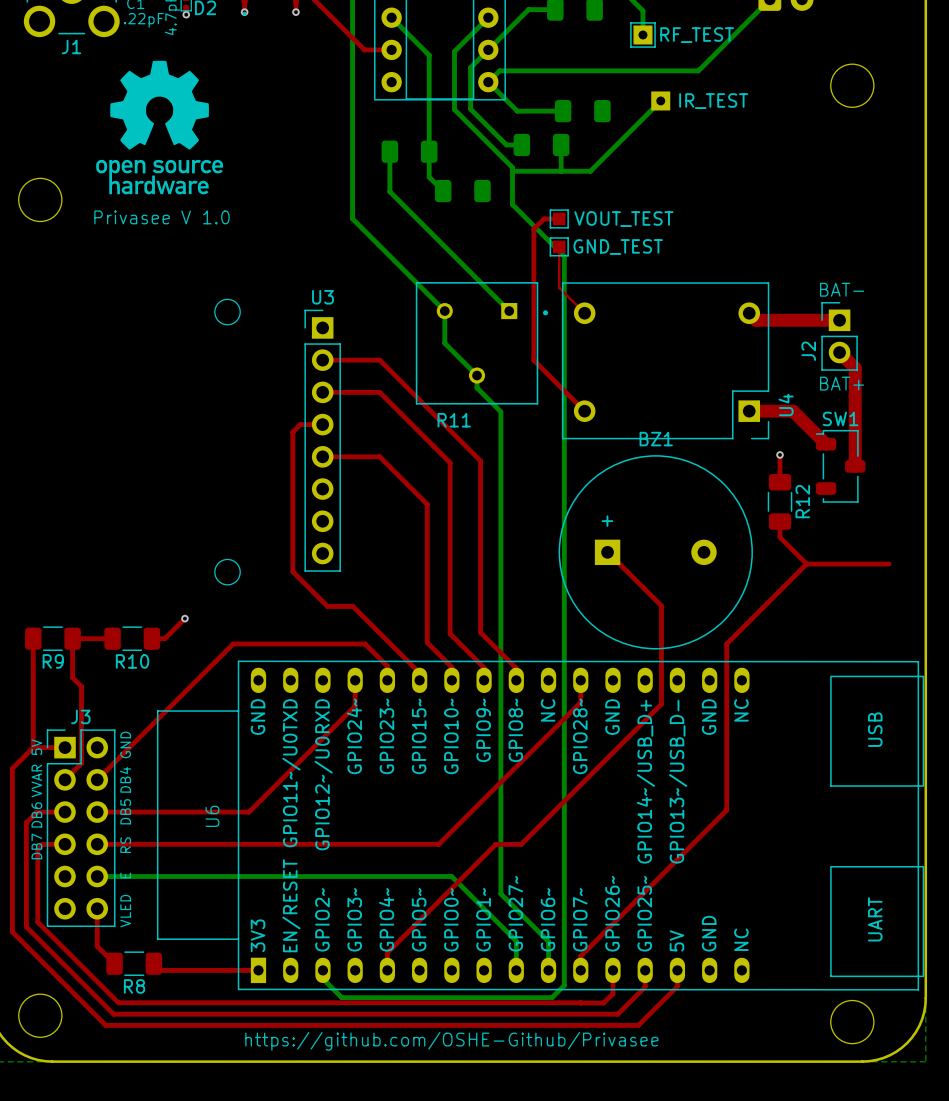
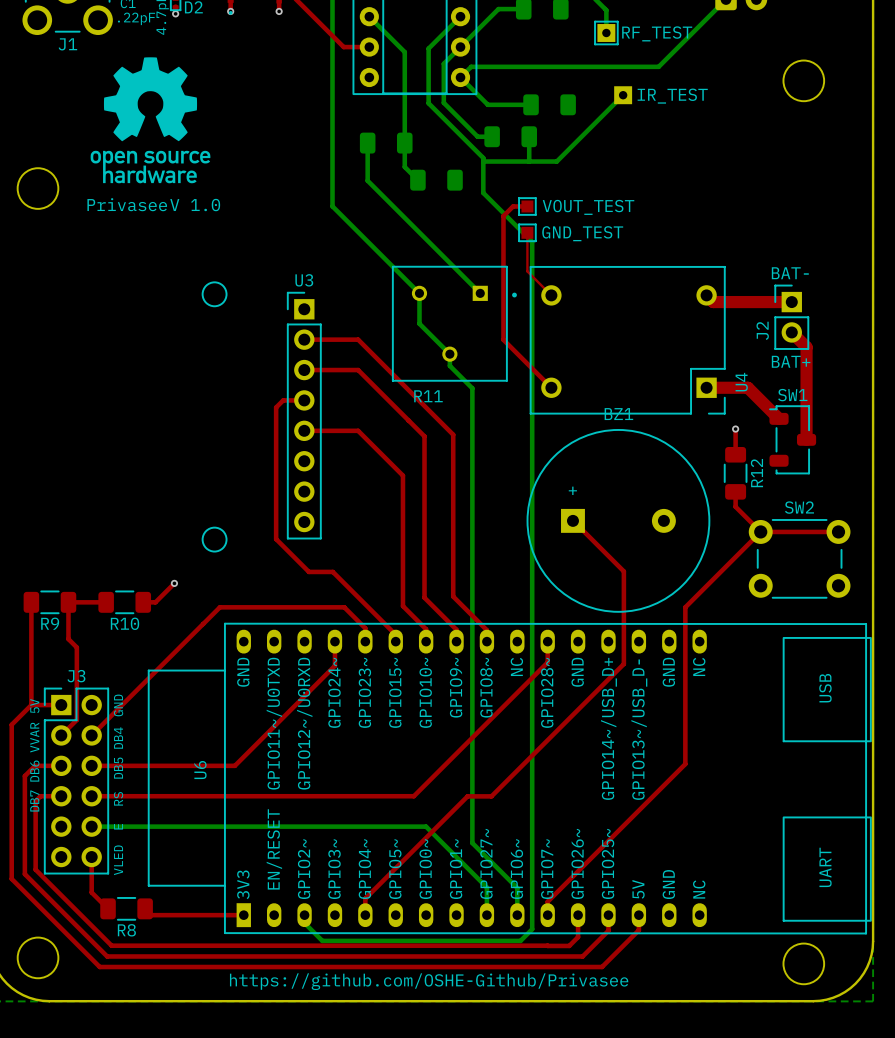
SW2: none -> (799, 558)

